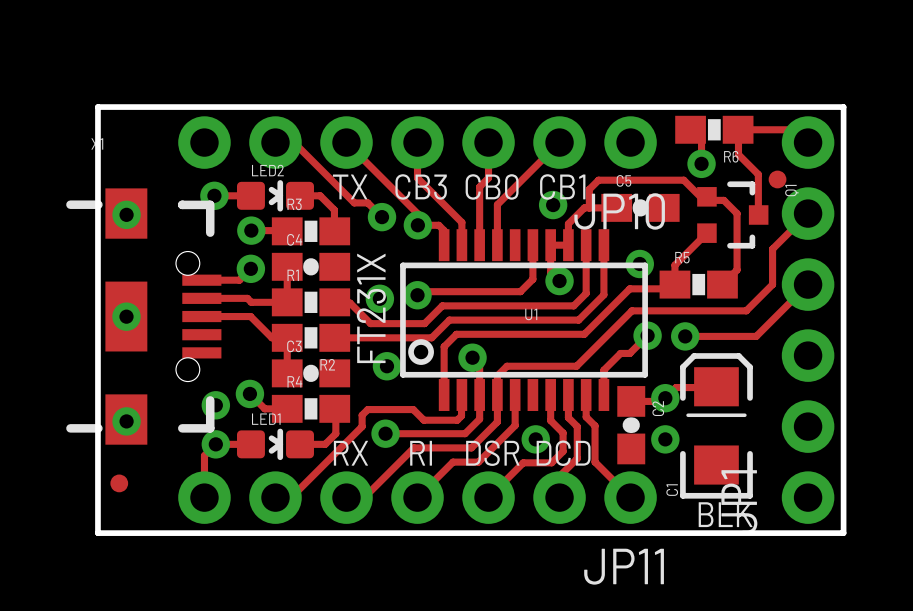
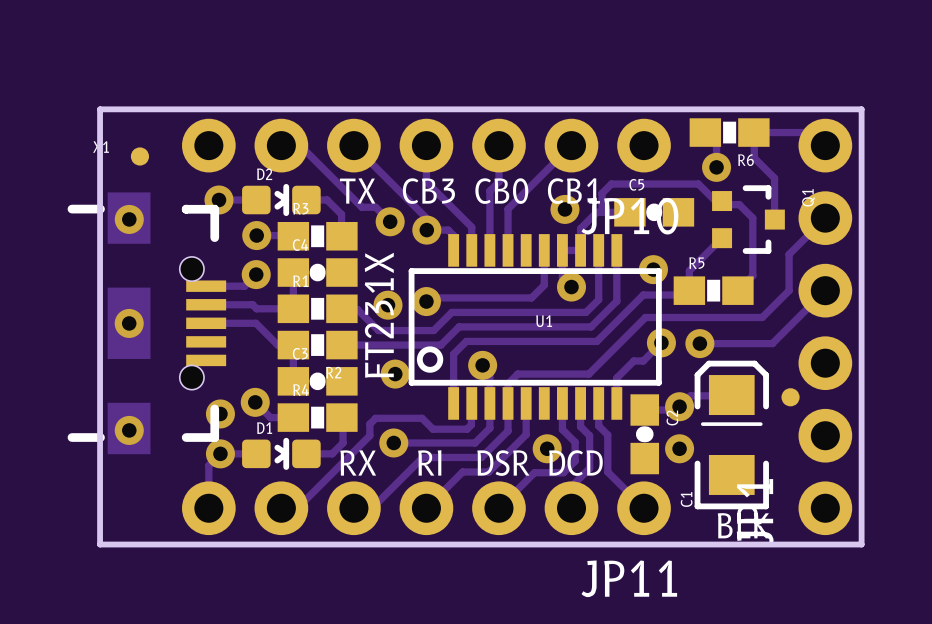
part: none -> (139, 156)
LED2 name: LED2 (267, 170) -> D2 (264, 174)
part position: (777, 179) -> (790, 397)
LED1 name: LED1 (266, 419) -> D1 (264, 428)
part: (119, 483) -> none

